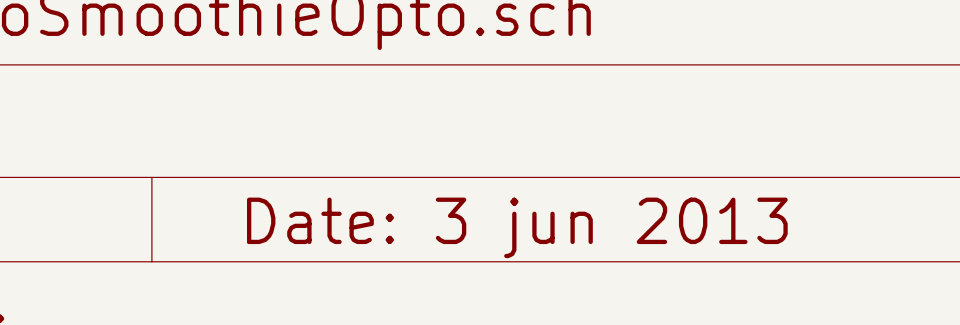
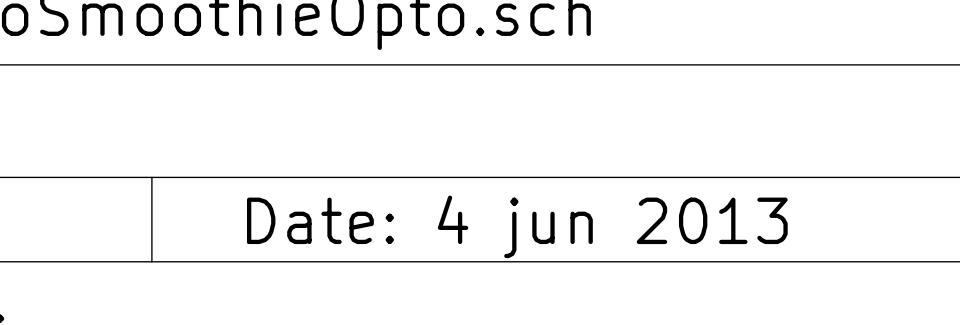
title block: Date: 3 jun 2013 (517, 227) -> Date: 4 jun 2013 (517, 226)

